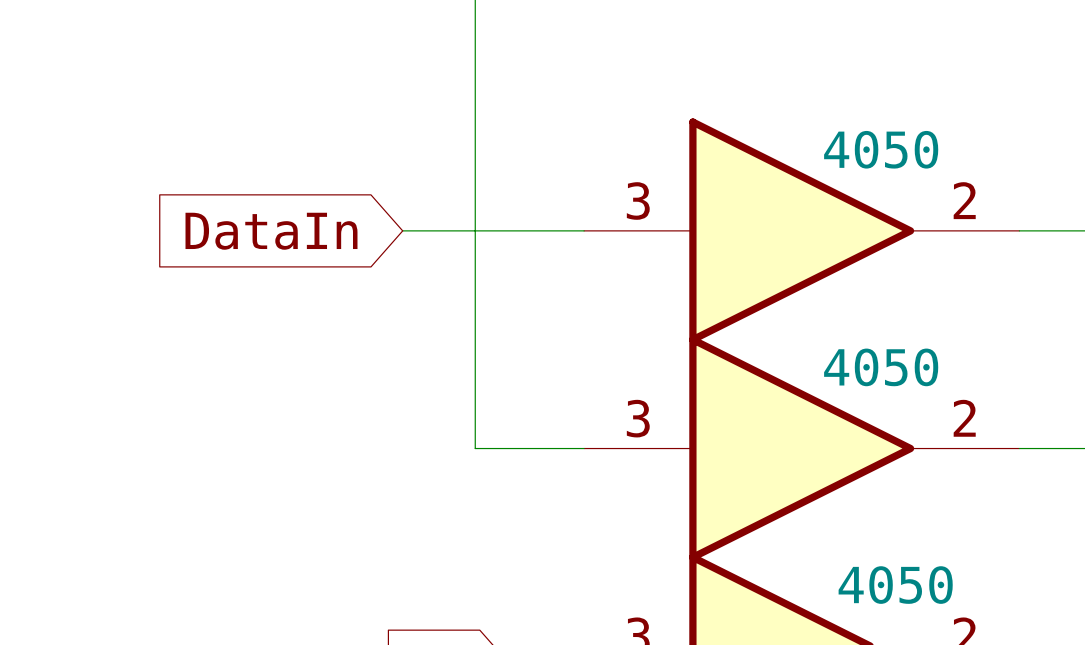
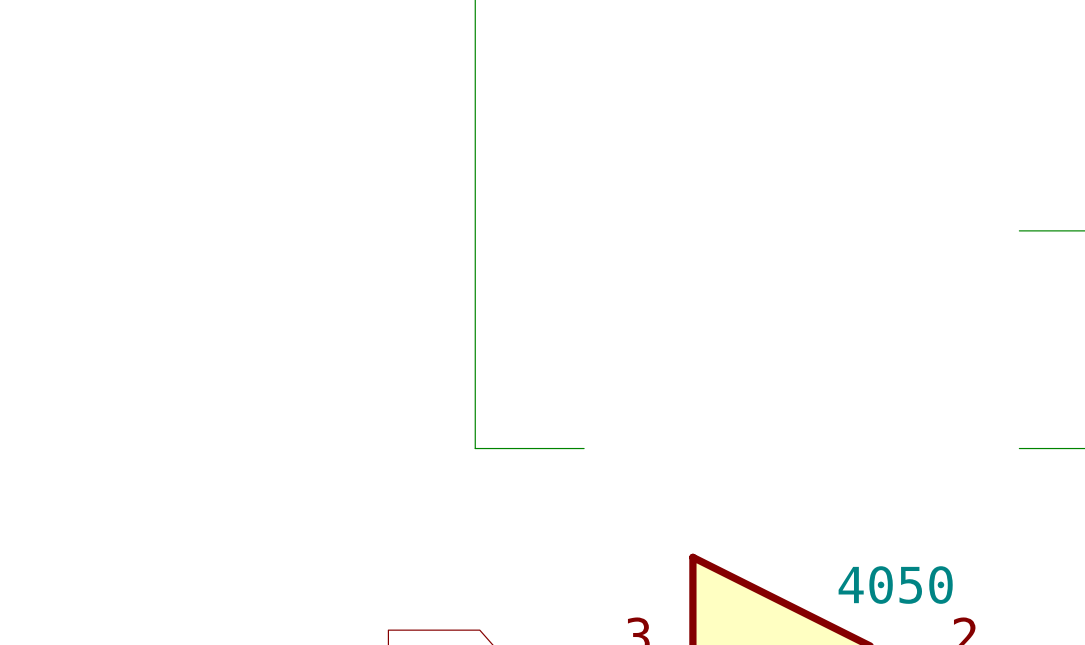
wire: (402, 230) (584, 230) -> none
part: 4050 (801, 230) -> none
global label: DataIn (271, 231) -> none
part: 4050 (801, 448) -> none

